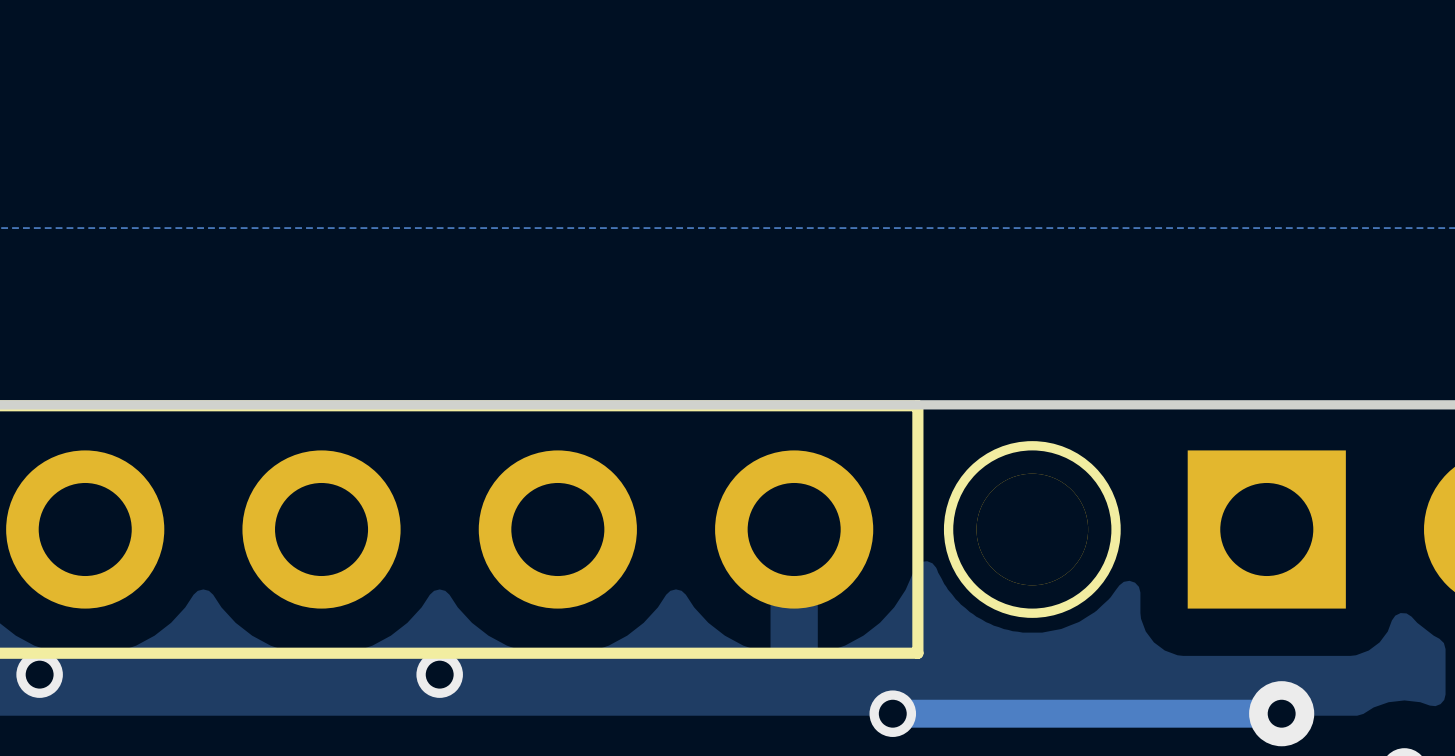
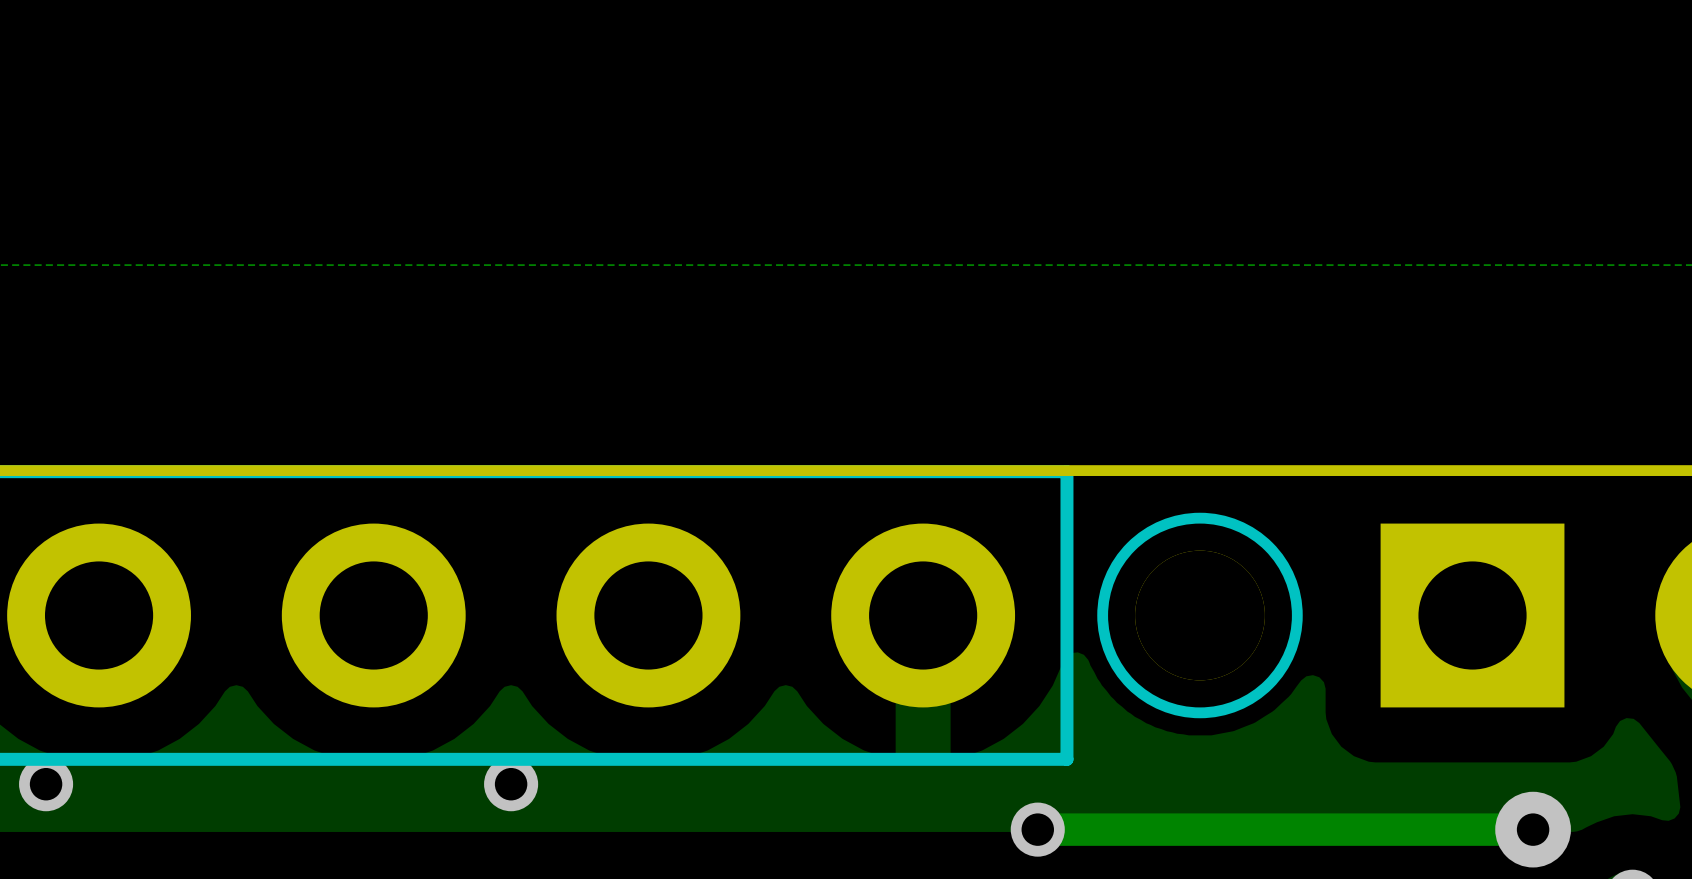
via position: (1281, 713) -> (1533, 829)

